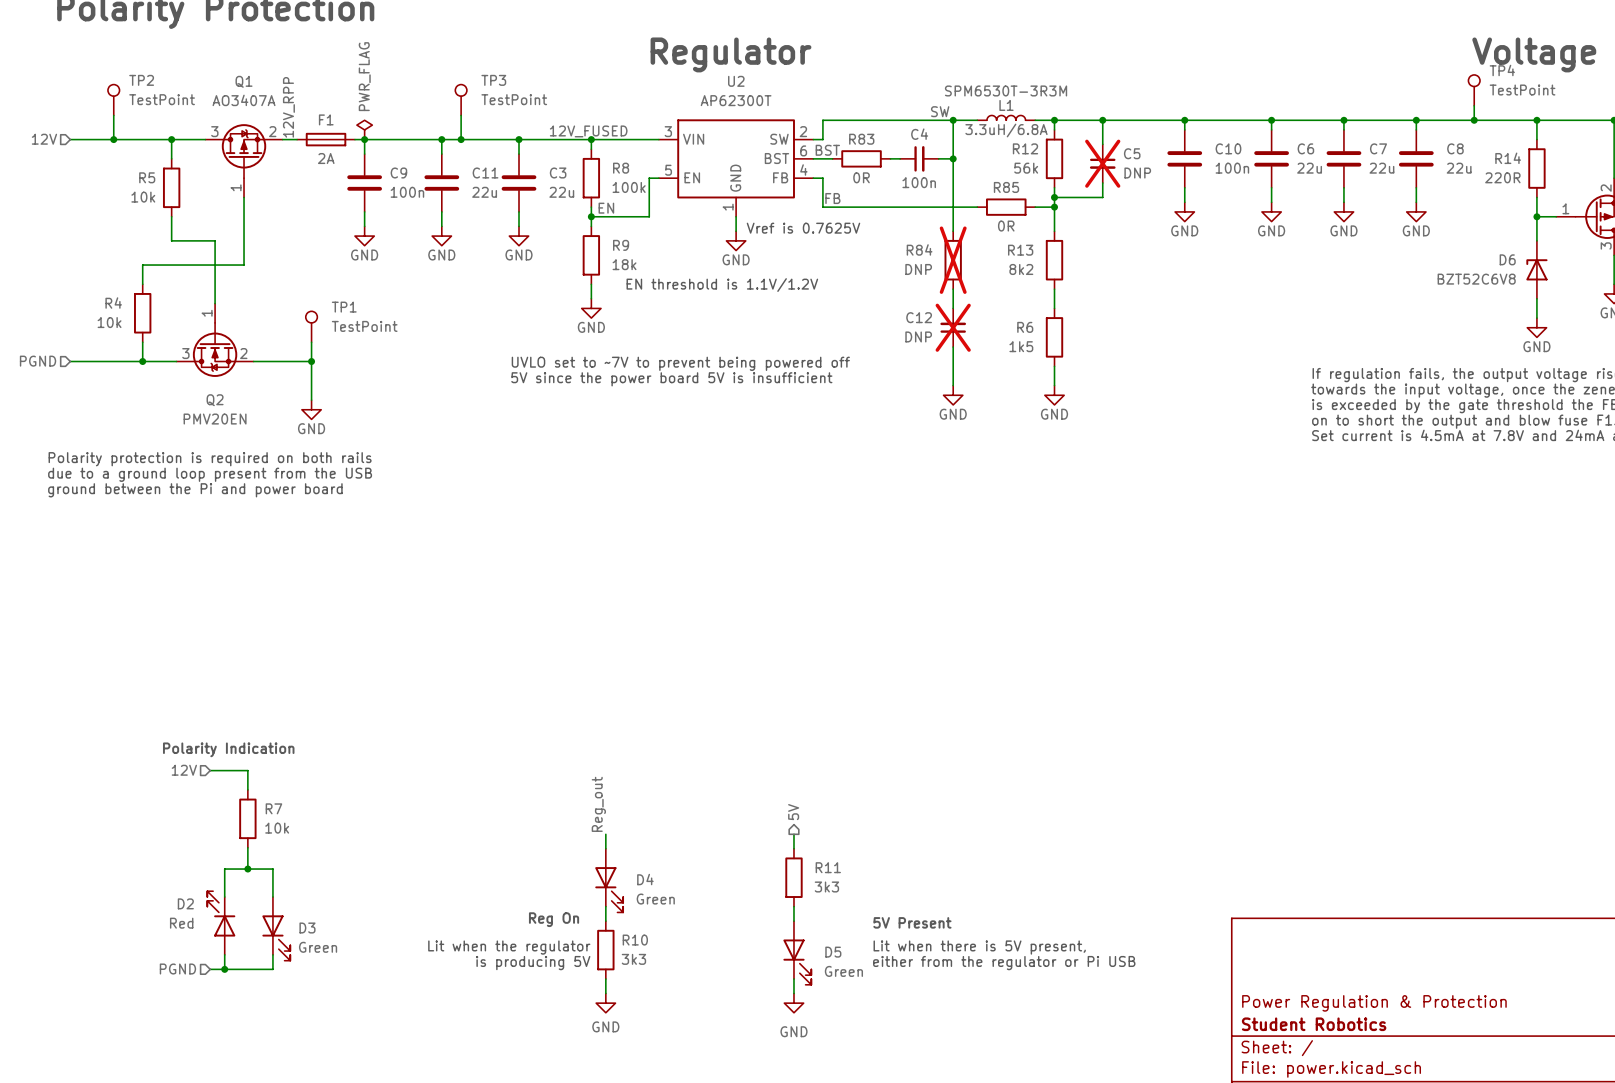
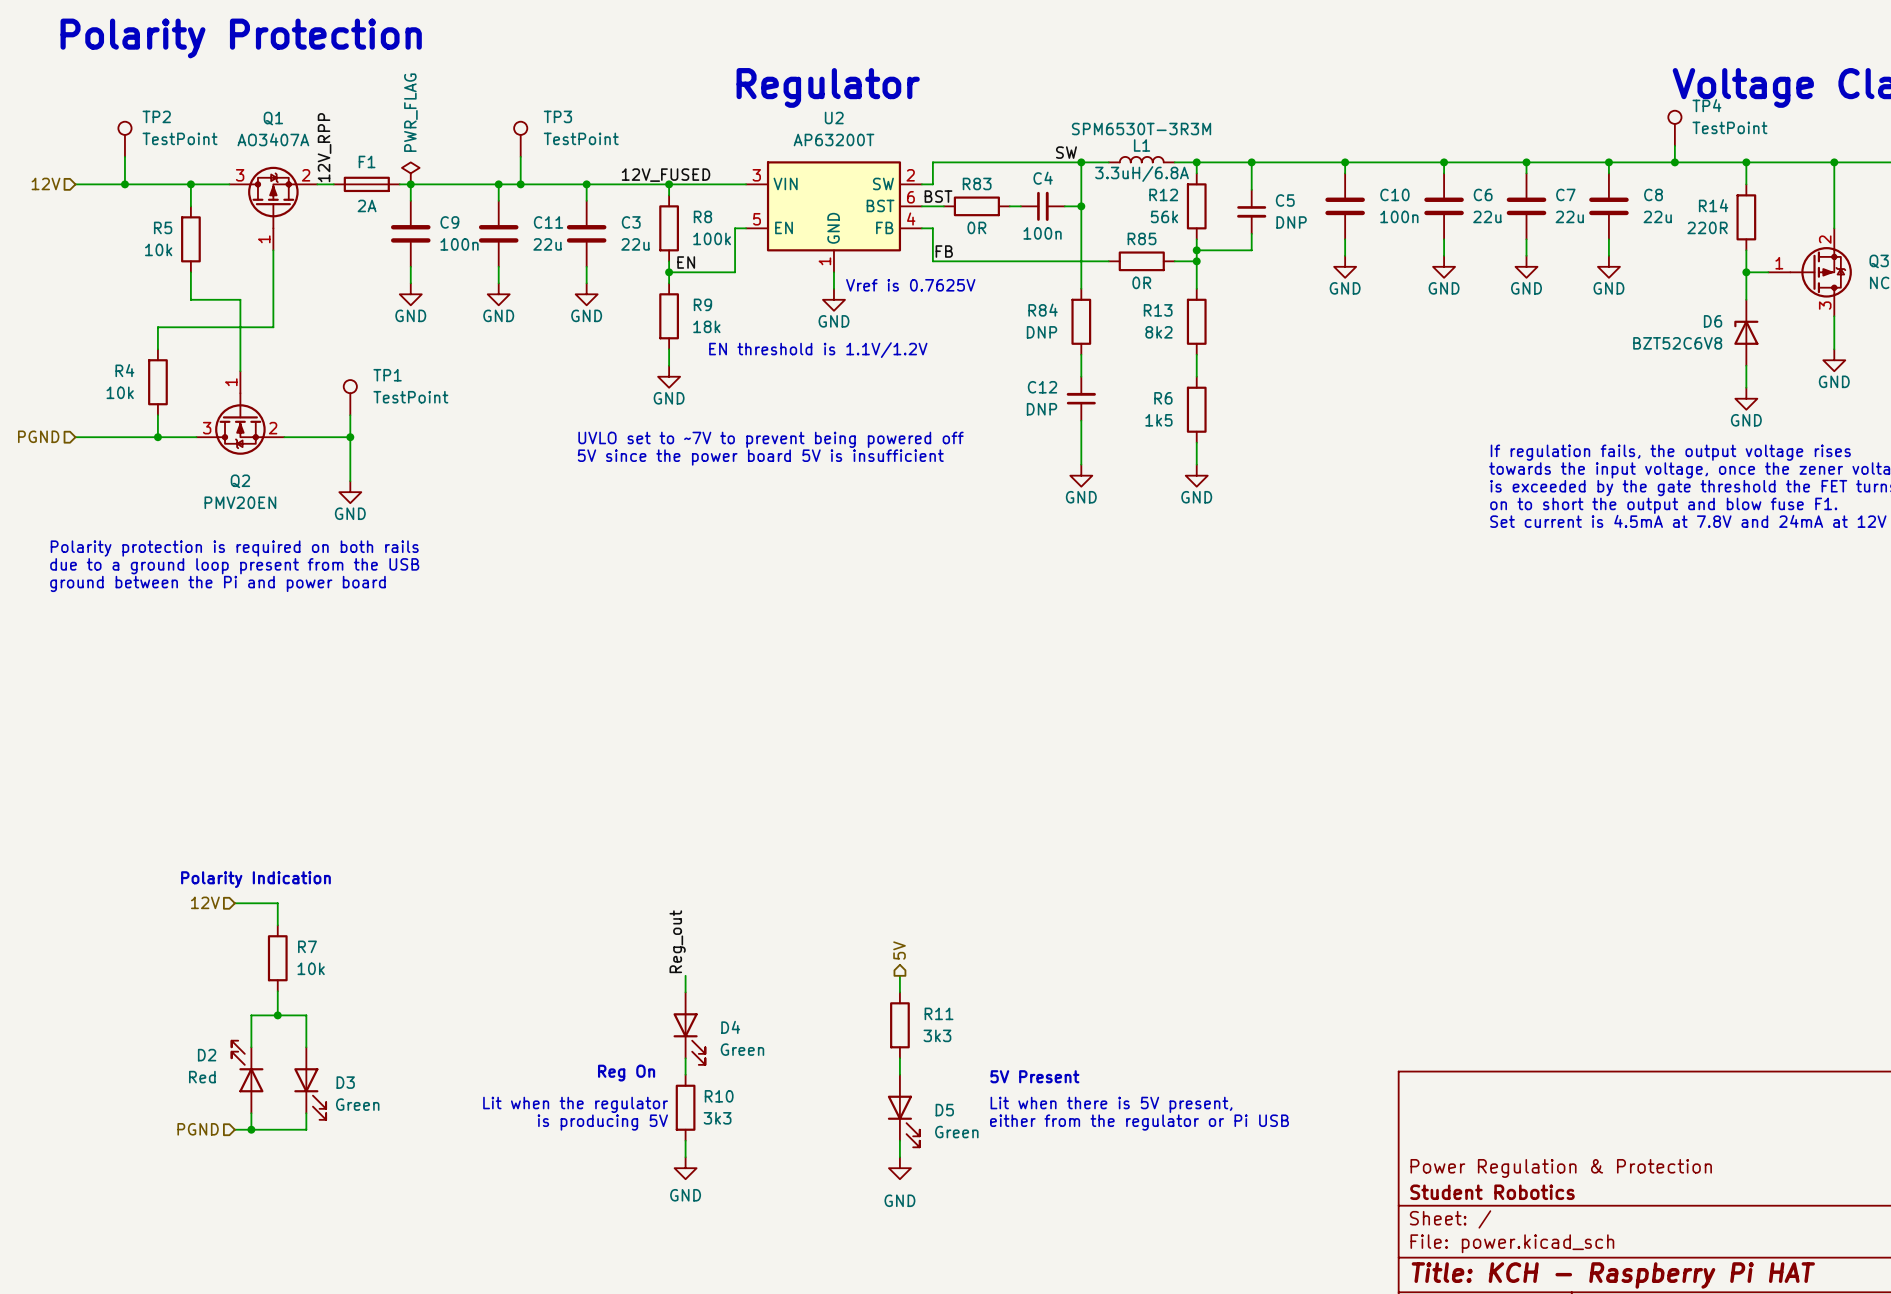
U2 value: AP62300T (736, 100) -> AP63200T (833, 139)
C5 do-not-place cross: (1102, 163) -> none
R84 do-not-place cross: (953, 260) -> none
C12 do-not-place cross: (953, 327) -> none

